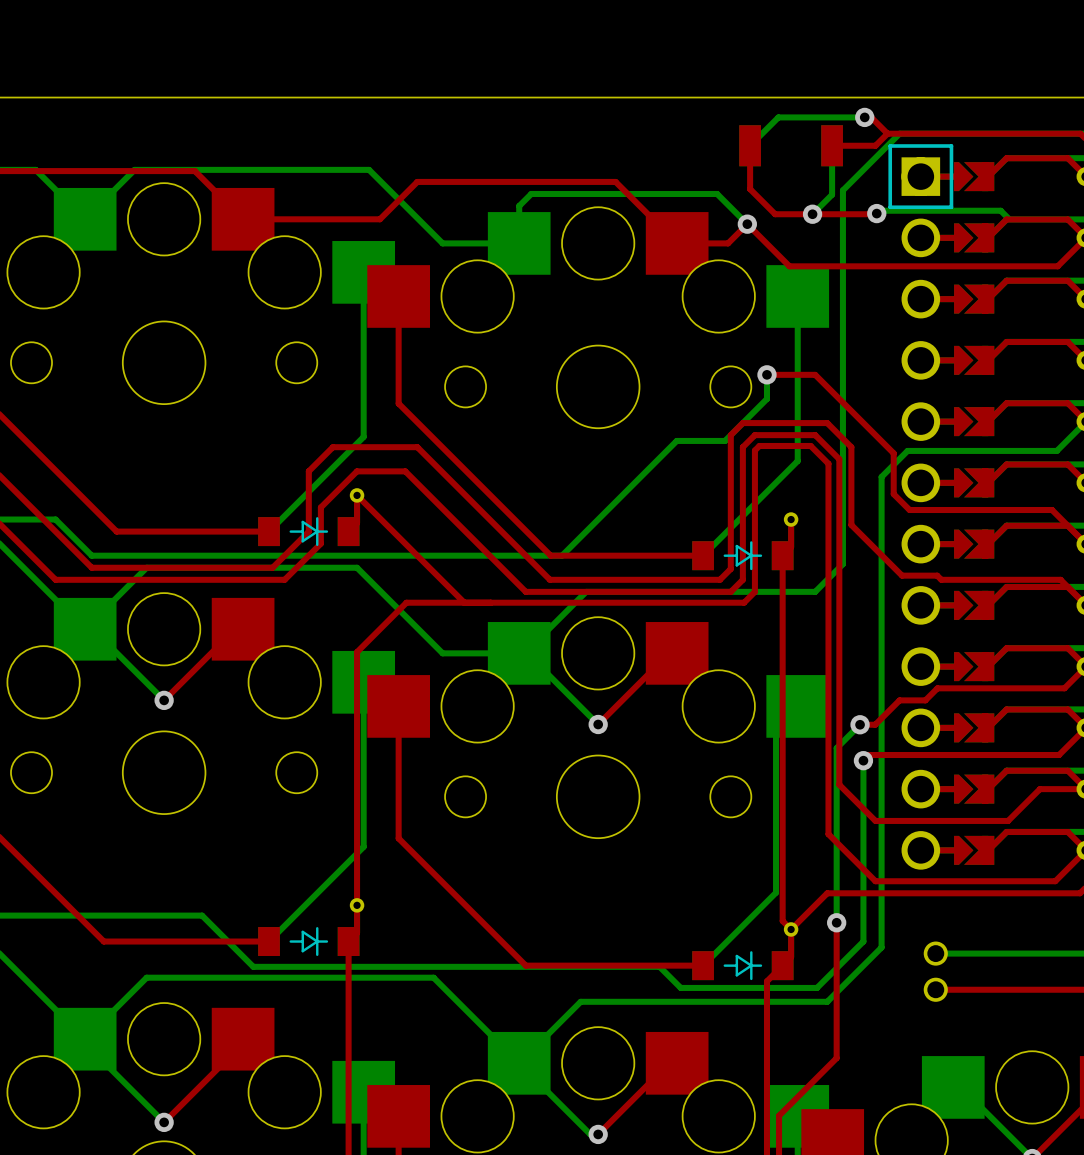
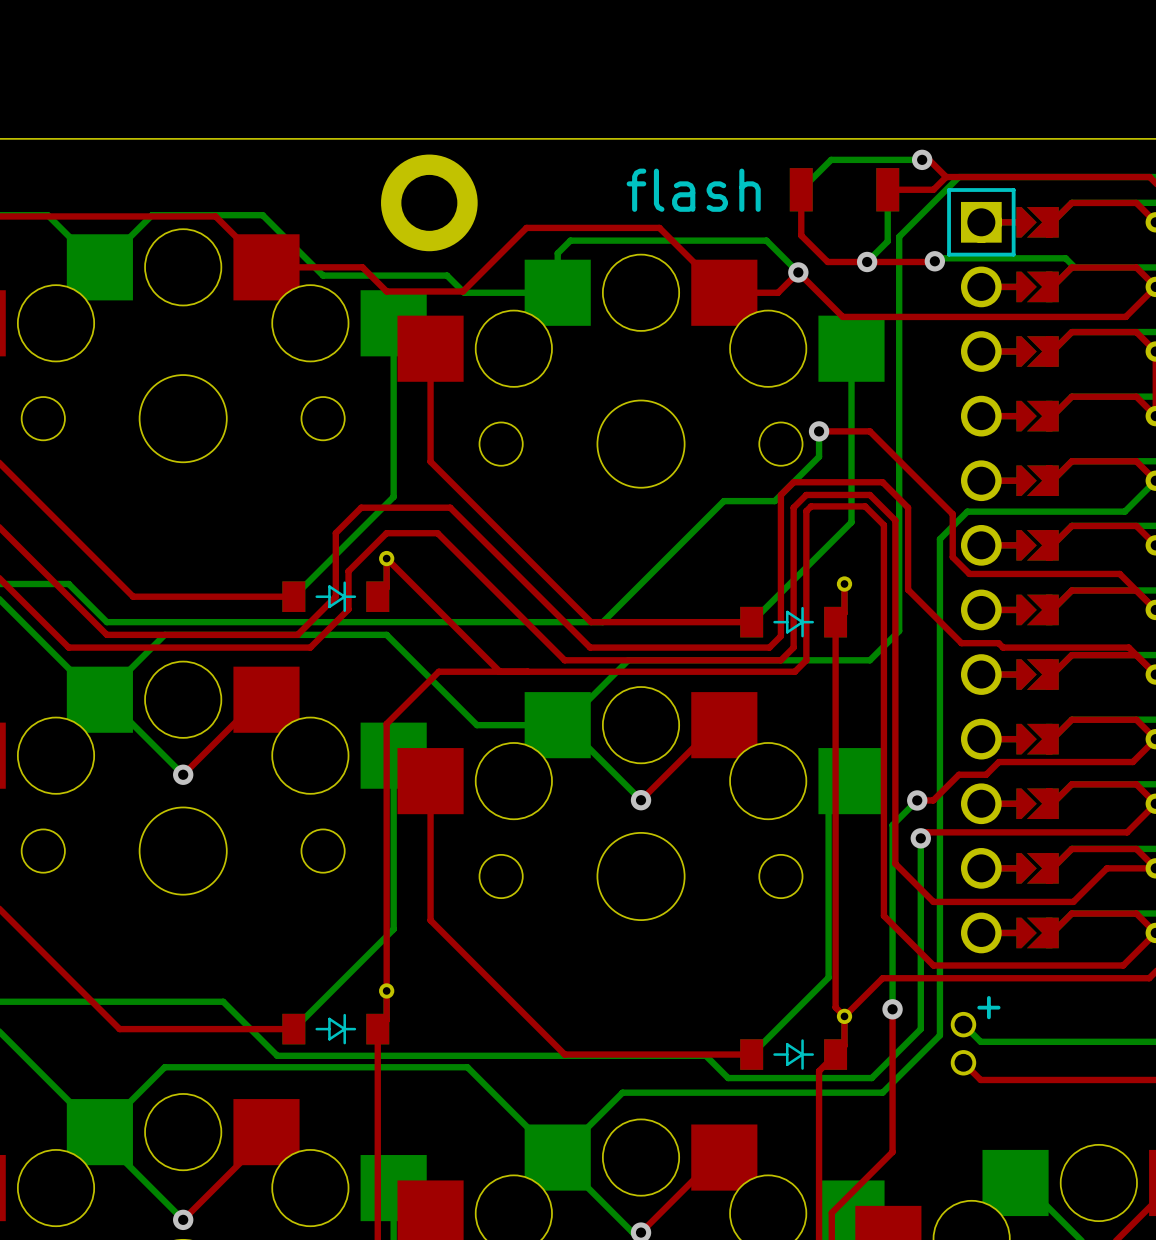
text: none -> flash (693, 190)
part: none -> (429, 202)
bottom track: (239, 169) (369, 169) (442, 243) -> (262, 215) (323, 275) (447, 275) (464, 292) (476, 292)
top track: (489, 181) (417, 181) (379, 219) (334, 219) -> (526, 227) (462, 291) (386, 291) (362, 267)
text: none -> + (988, 1007)
bottom track: none -> (963, 1024) (980, 1041) (997, 1041)
part position: (935, 971) -> (963, 1043)
top track: none -> (963, 1062) (980, 1079) (997, 1079)

